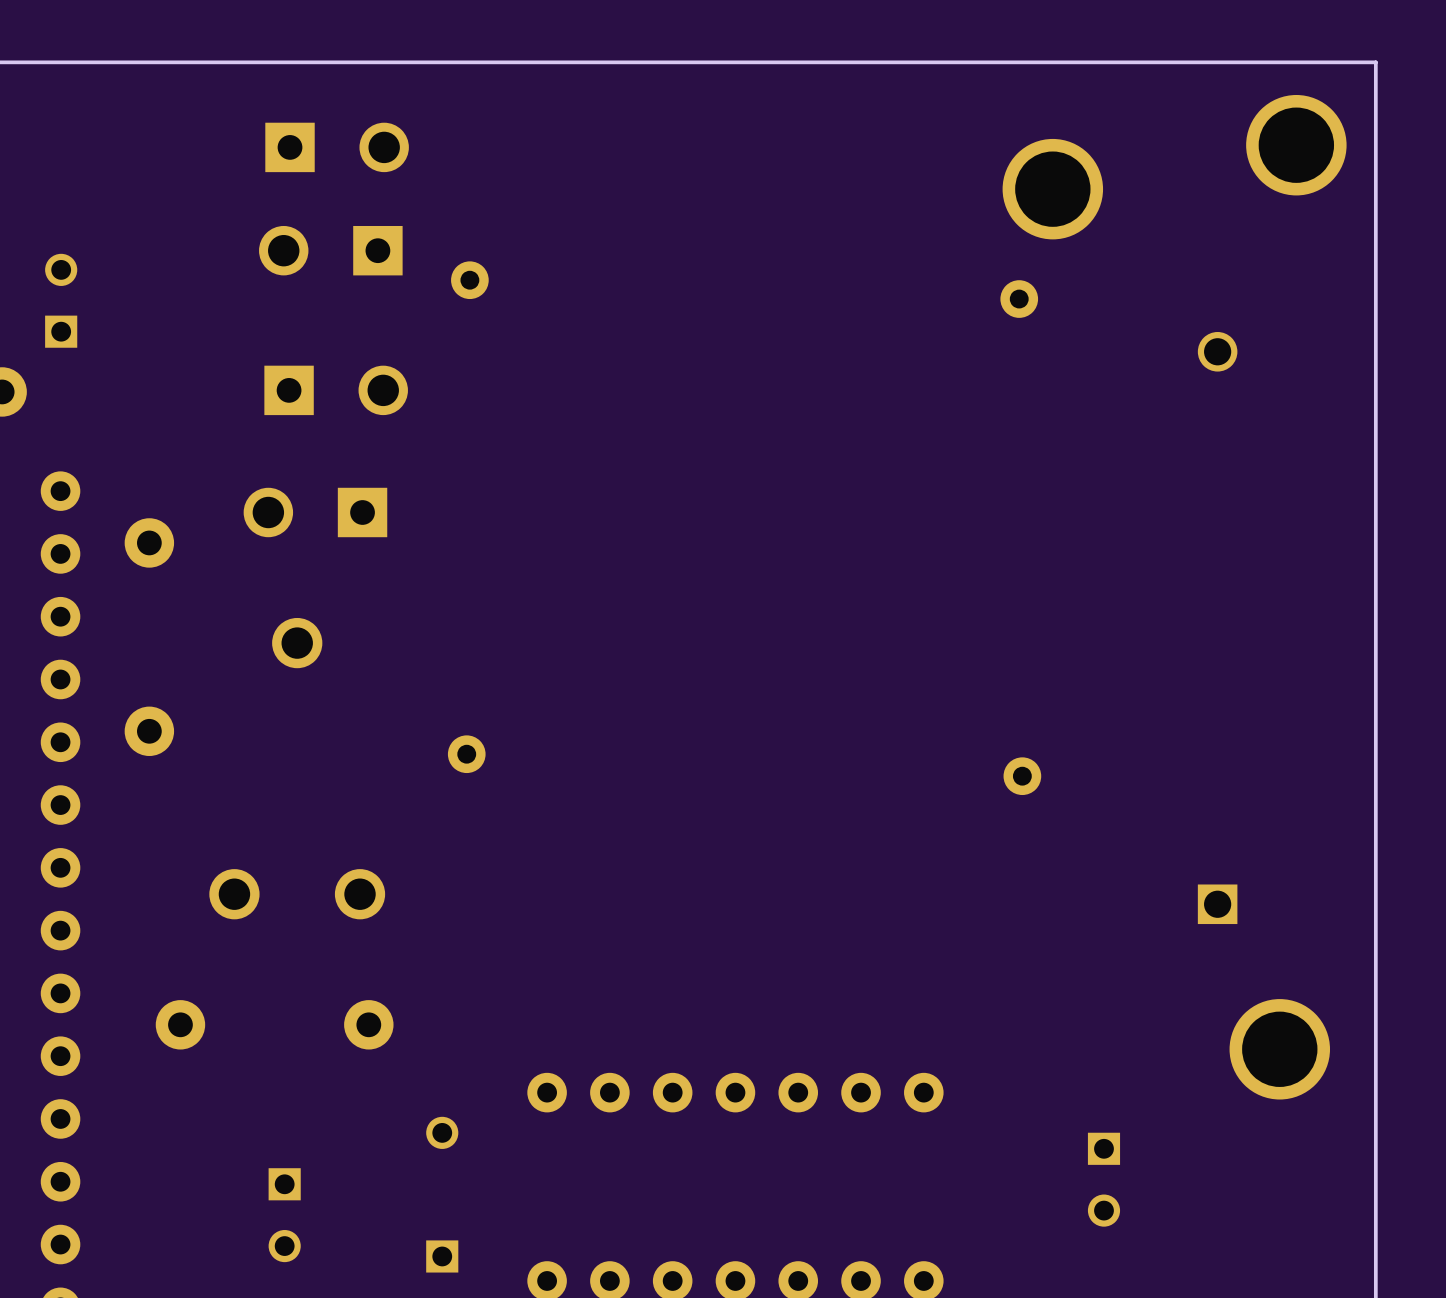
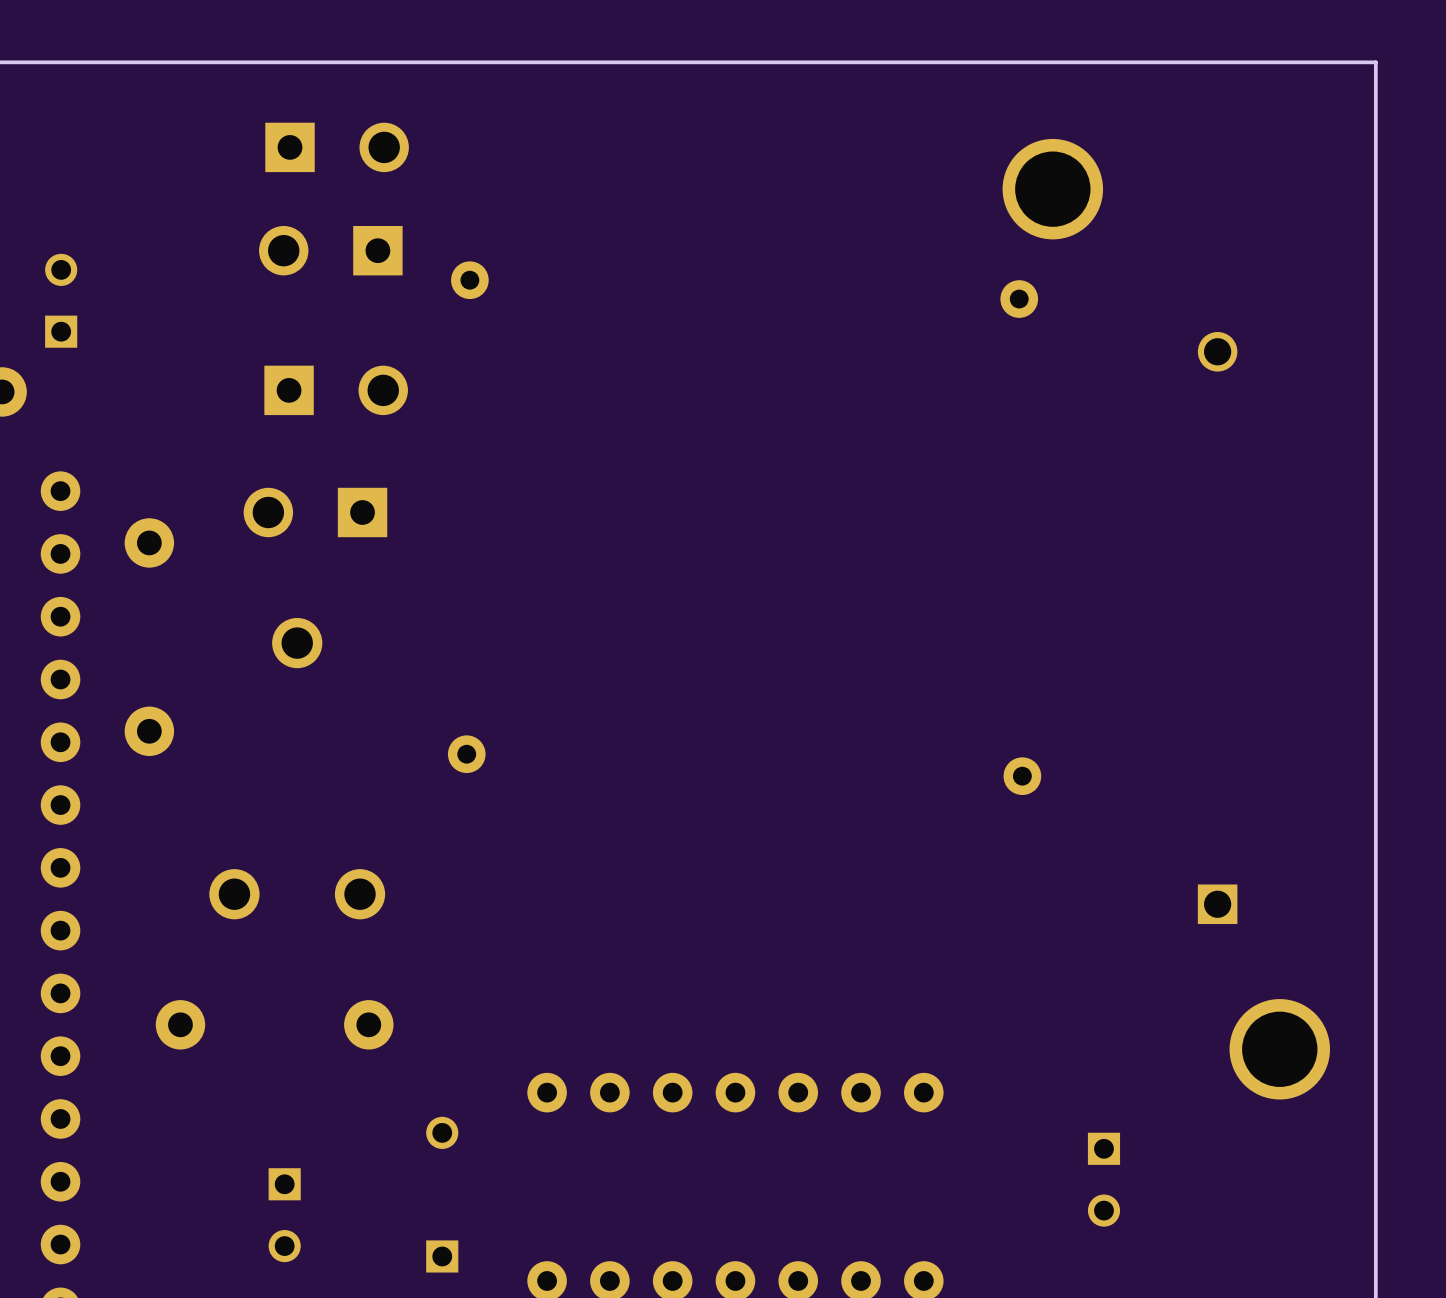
part: (1296, 145) -> none

